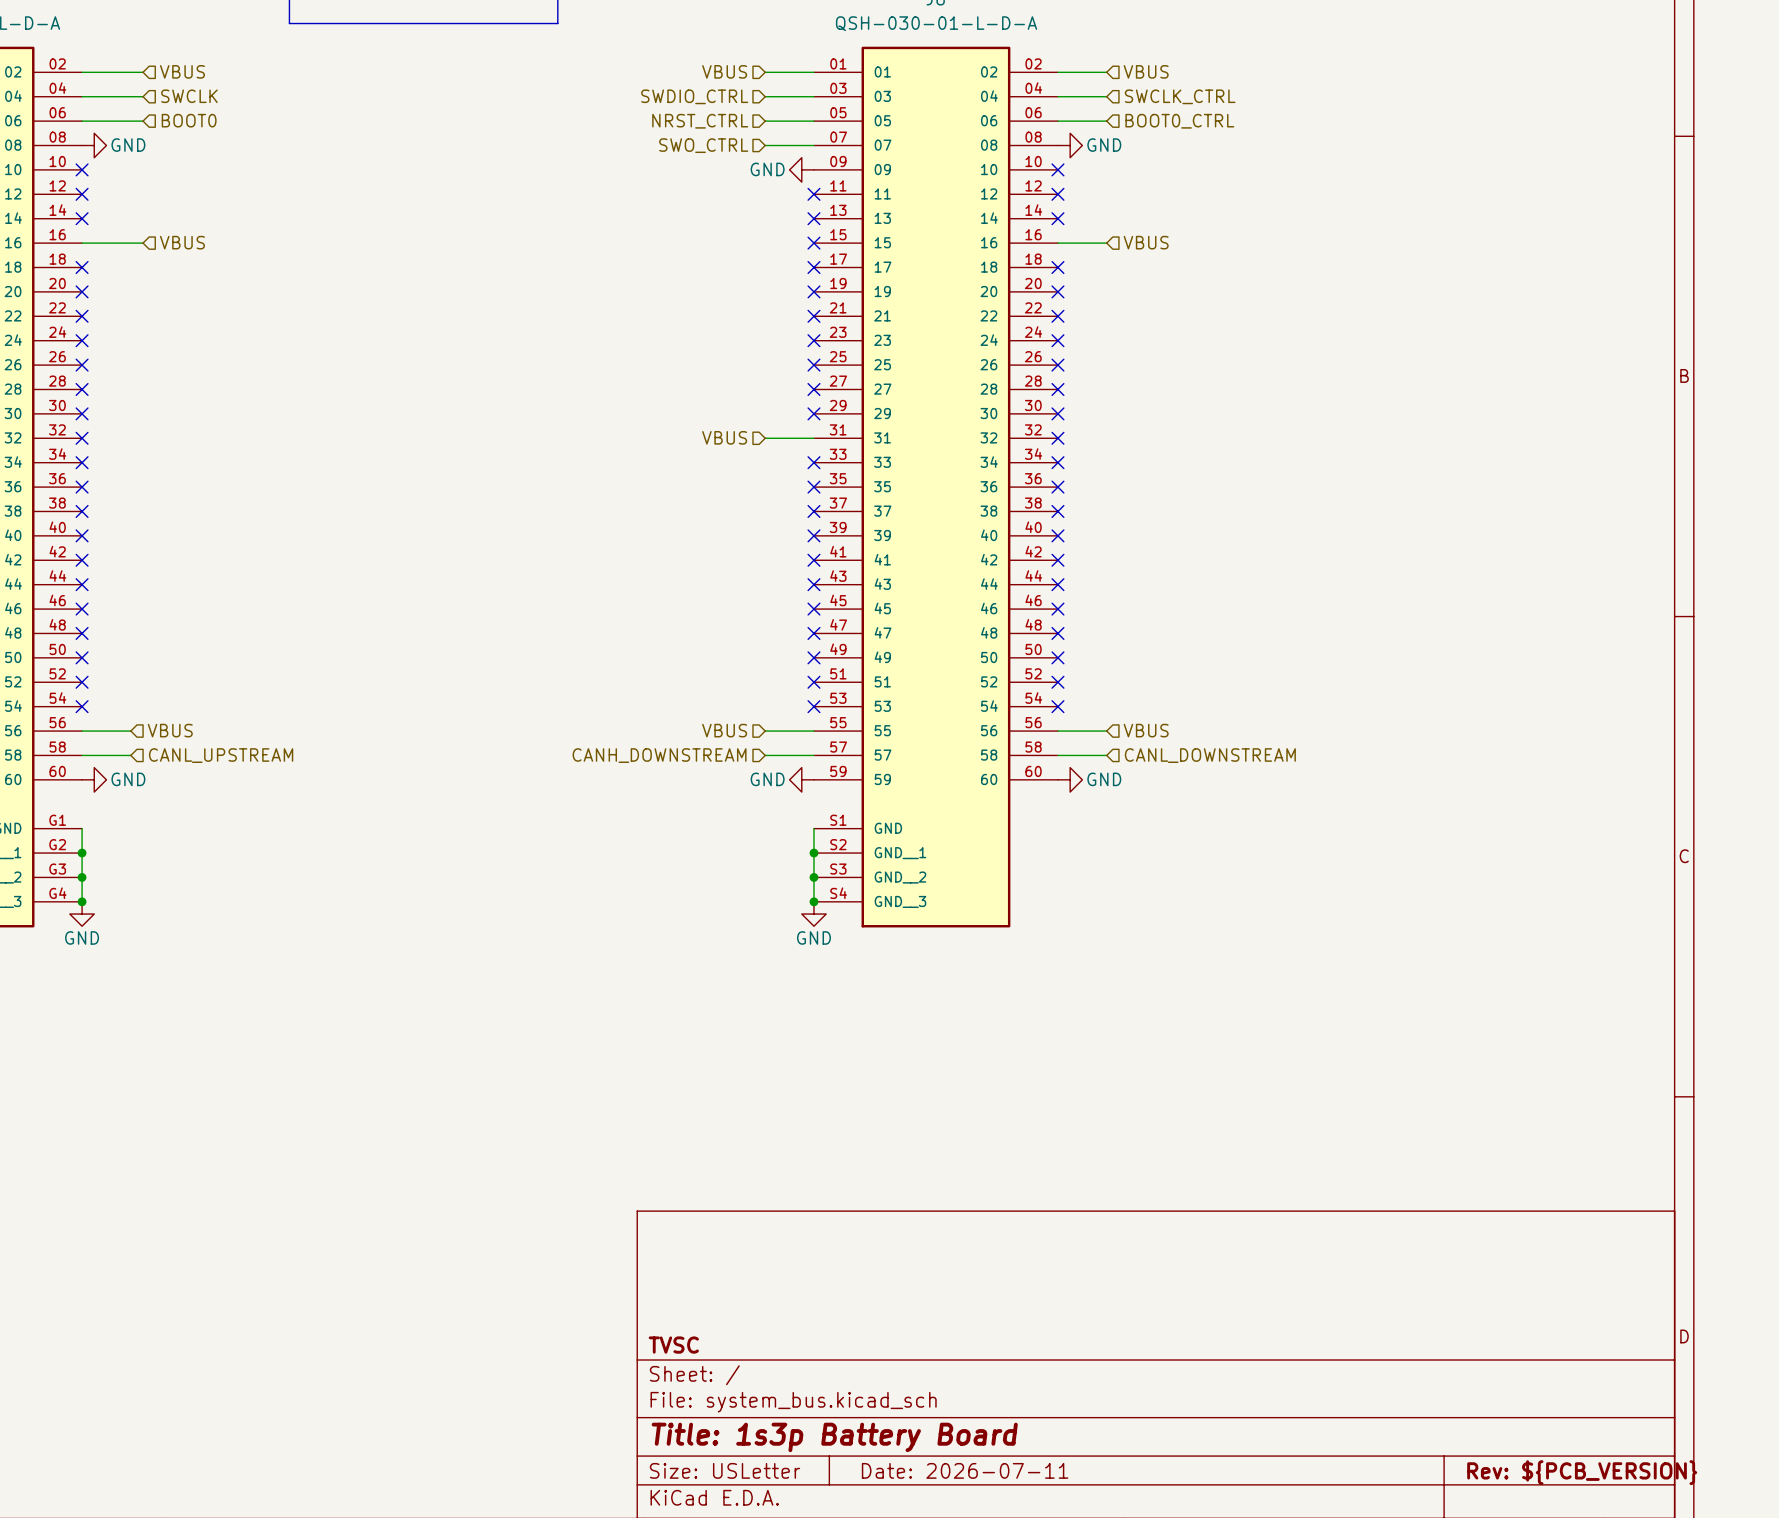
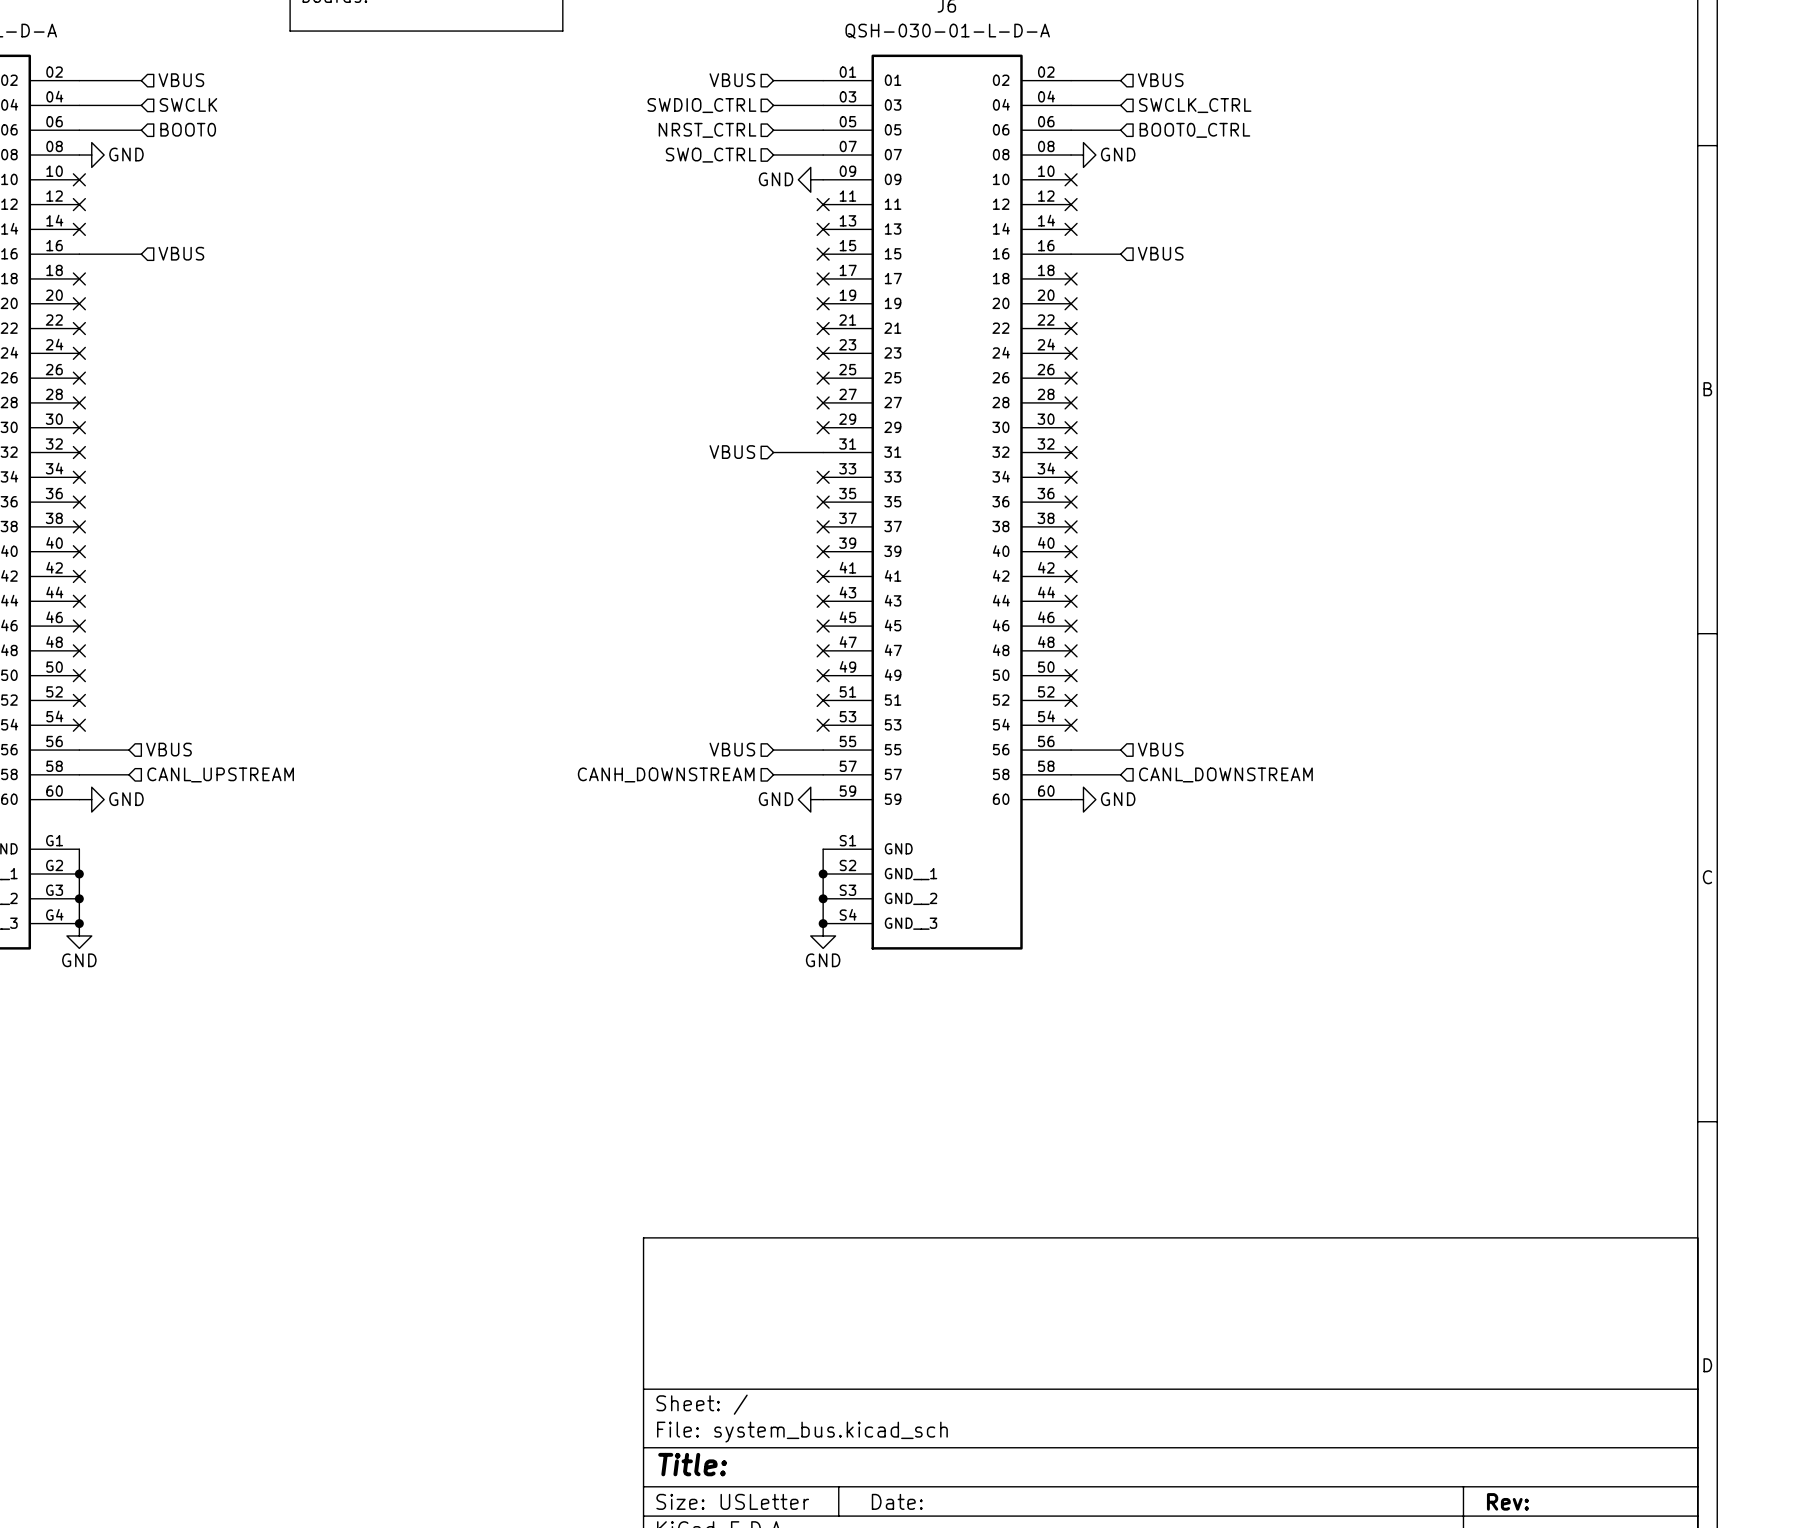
title block: TVSC (673, 1345) -> none
title block: Title: 1s3p Battery Board (834, 1437) -> Title: (692, 1464)
title block: Date: 2026-07-11 (965, 1470) -> Date: (897, 1501)
title block: Rev: ${PCB_VERSION} (1582, 1472) -> Rev: (1507, 1501)

